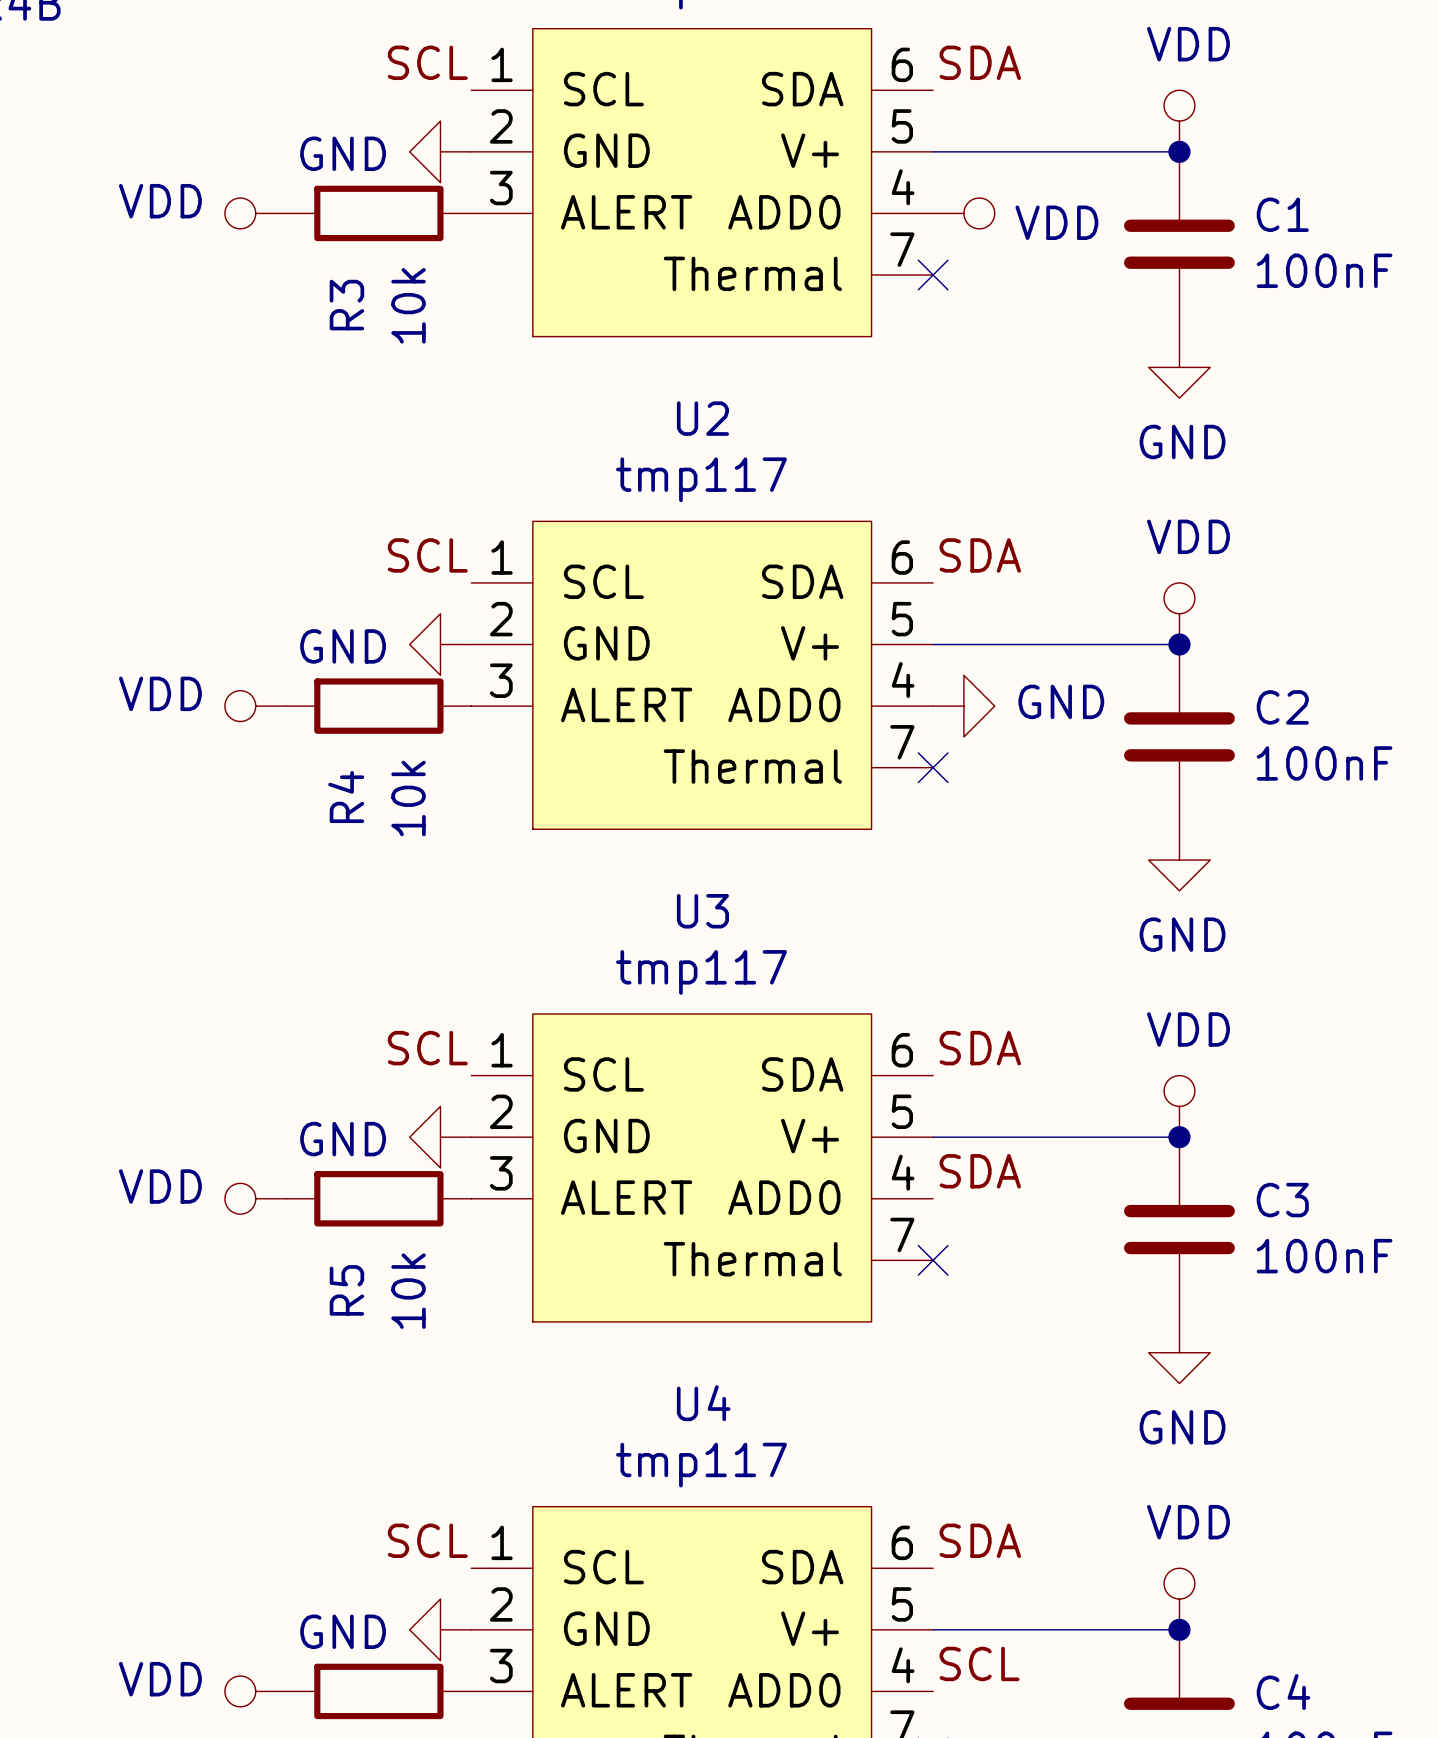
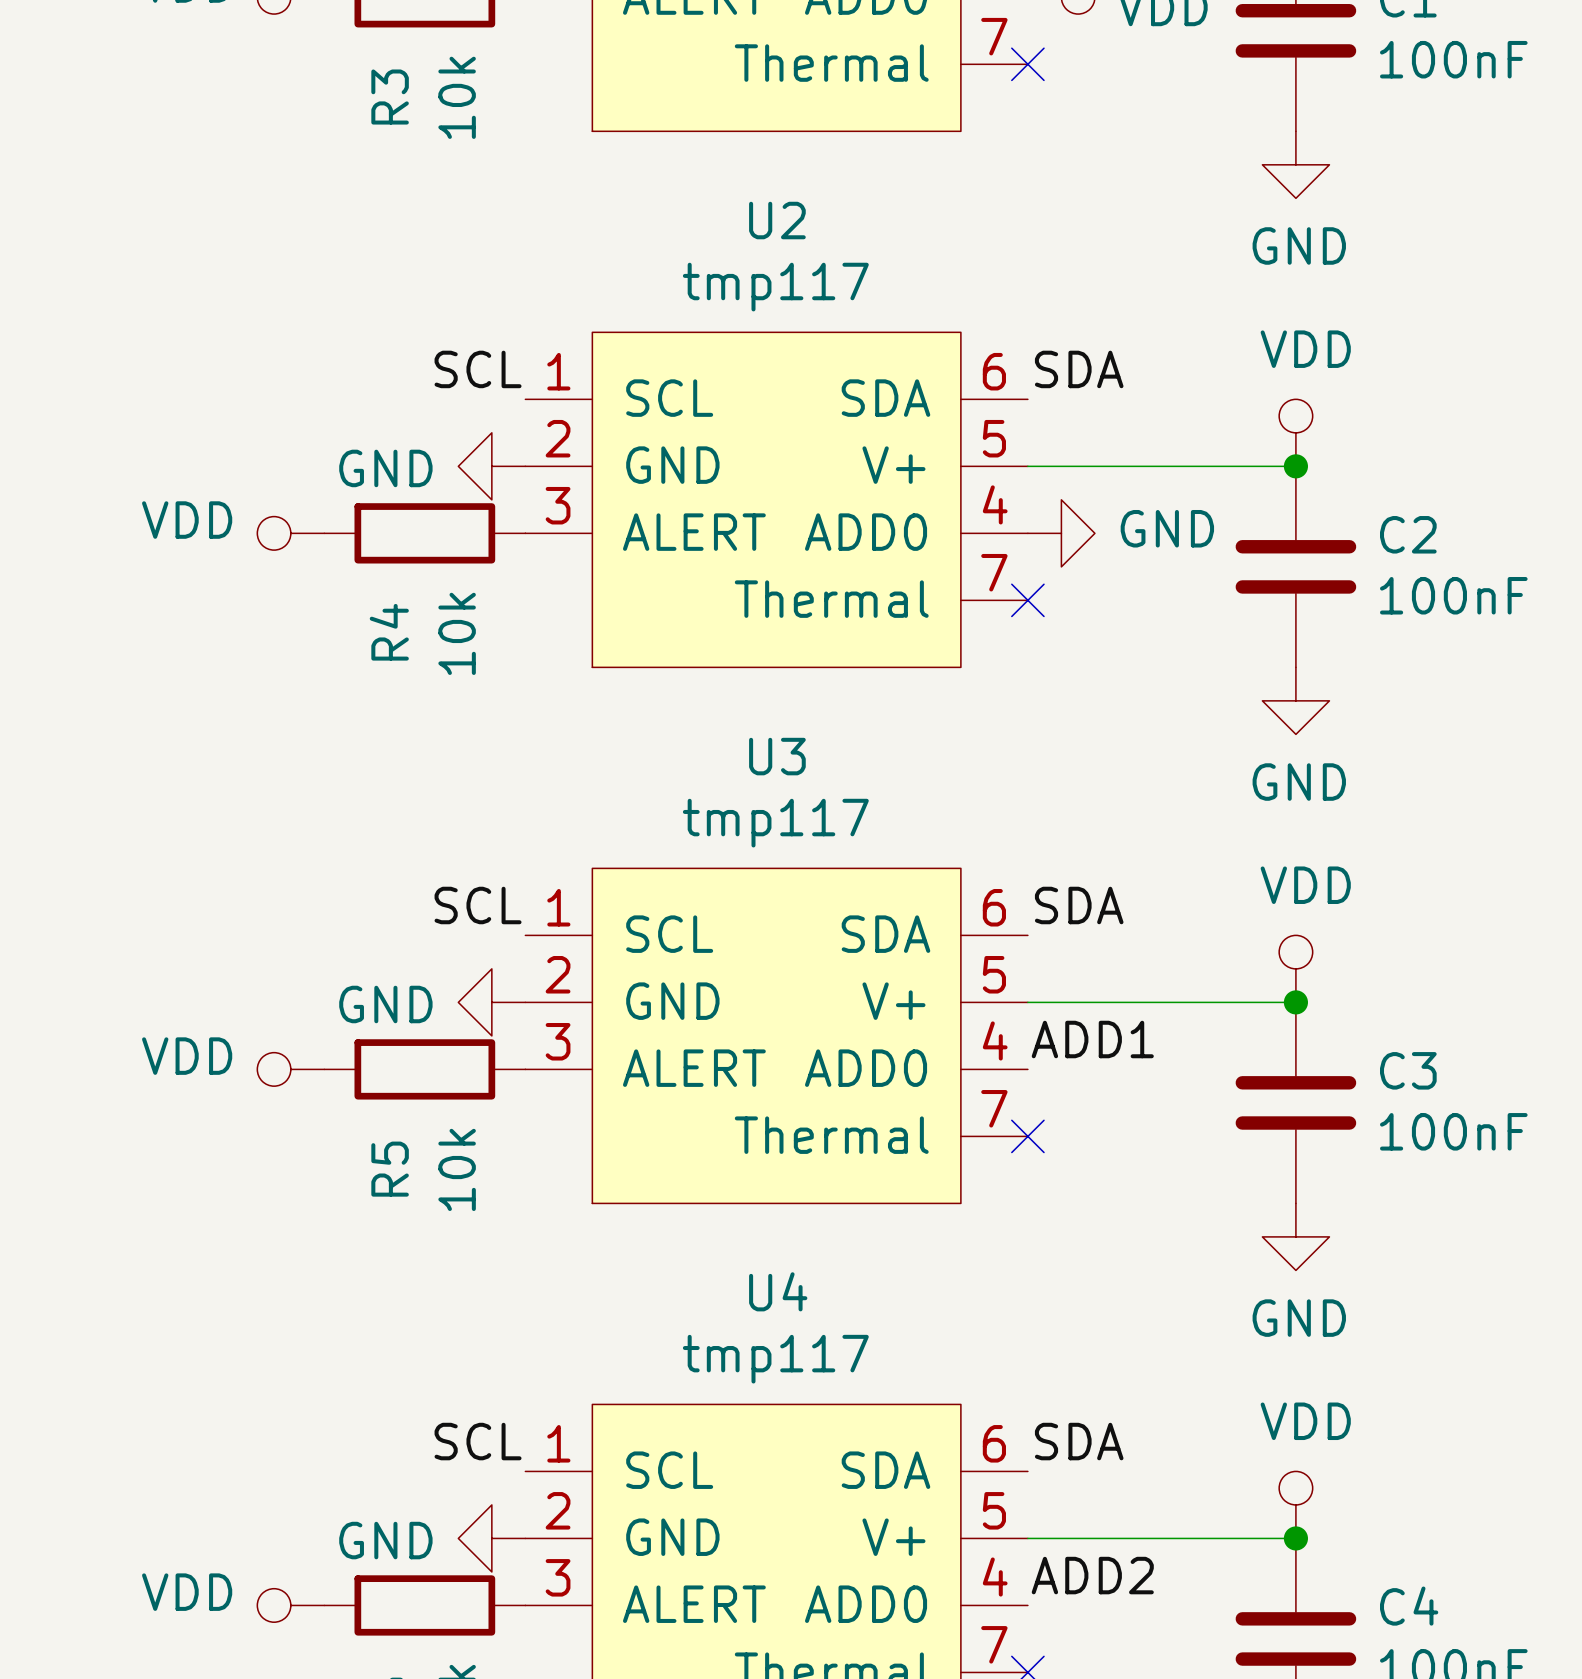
label: SDA (980, 1171) -> ADD1 (1092, 1039)
label: SCL (979, 1663) -> ADD2 (1092, 1575)

